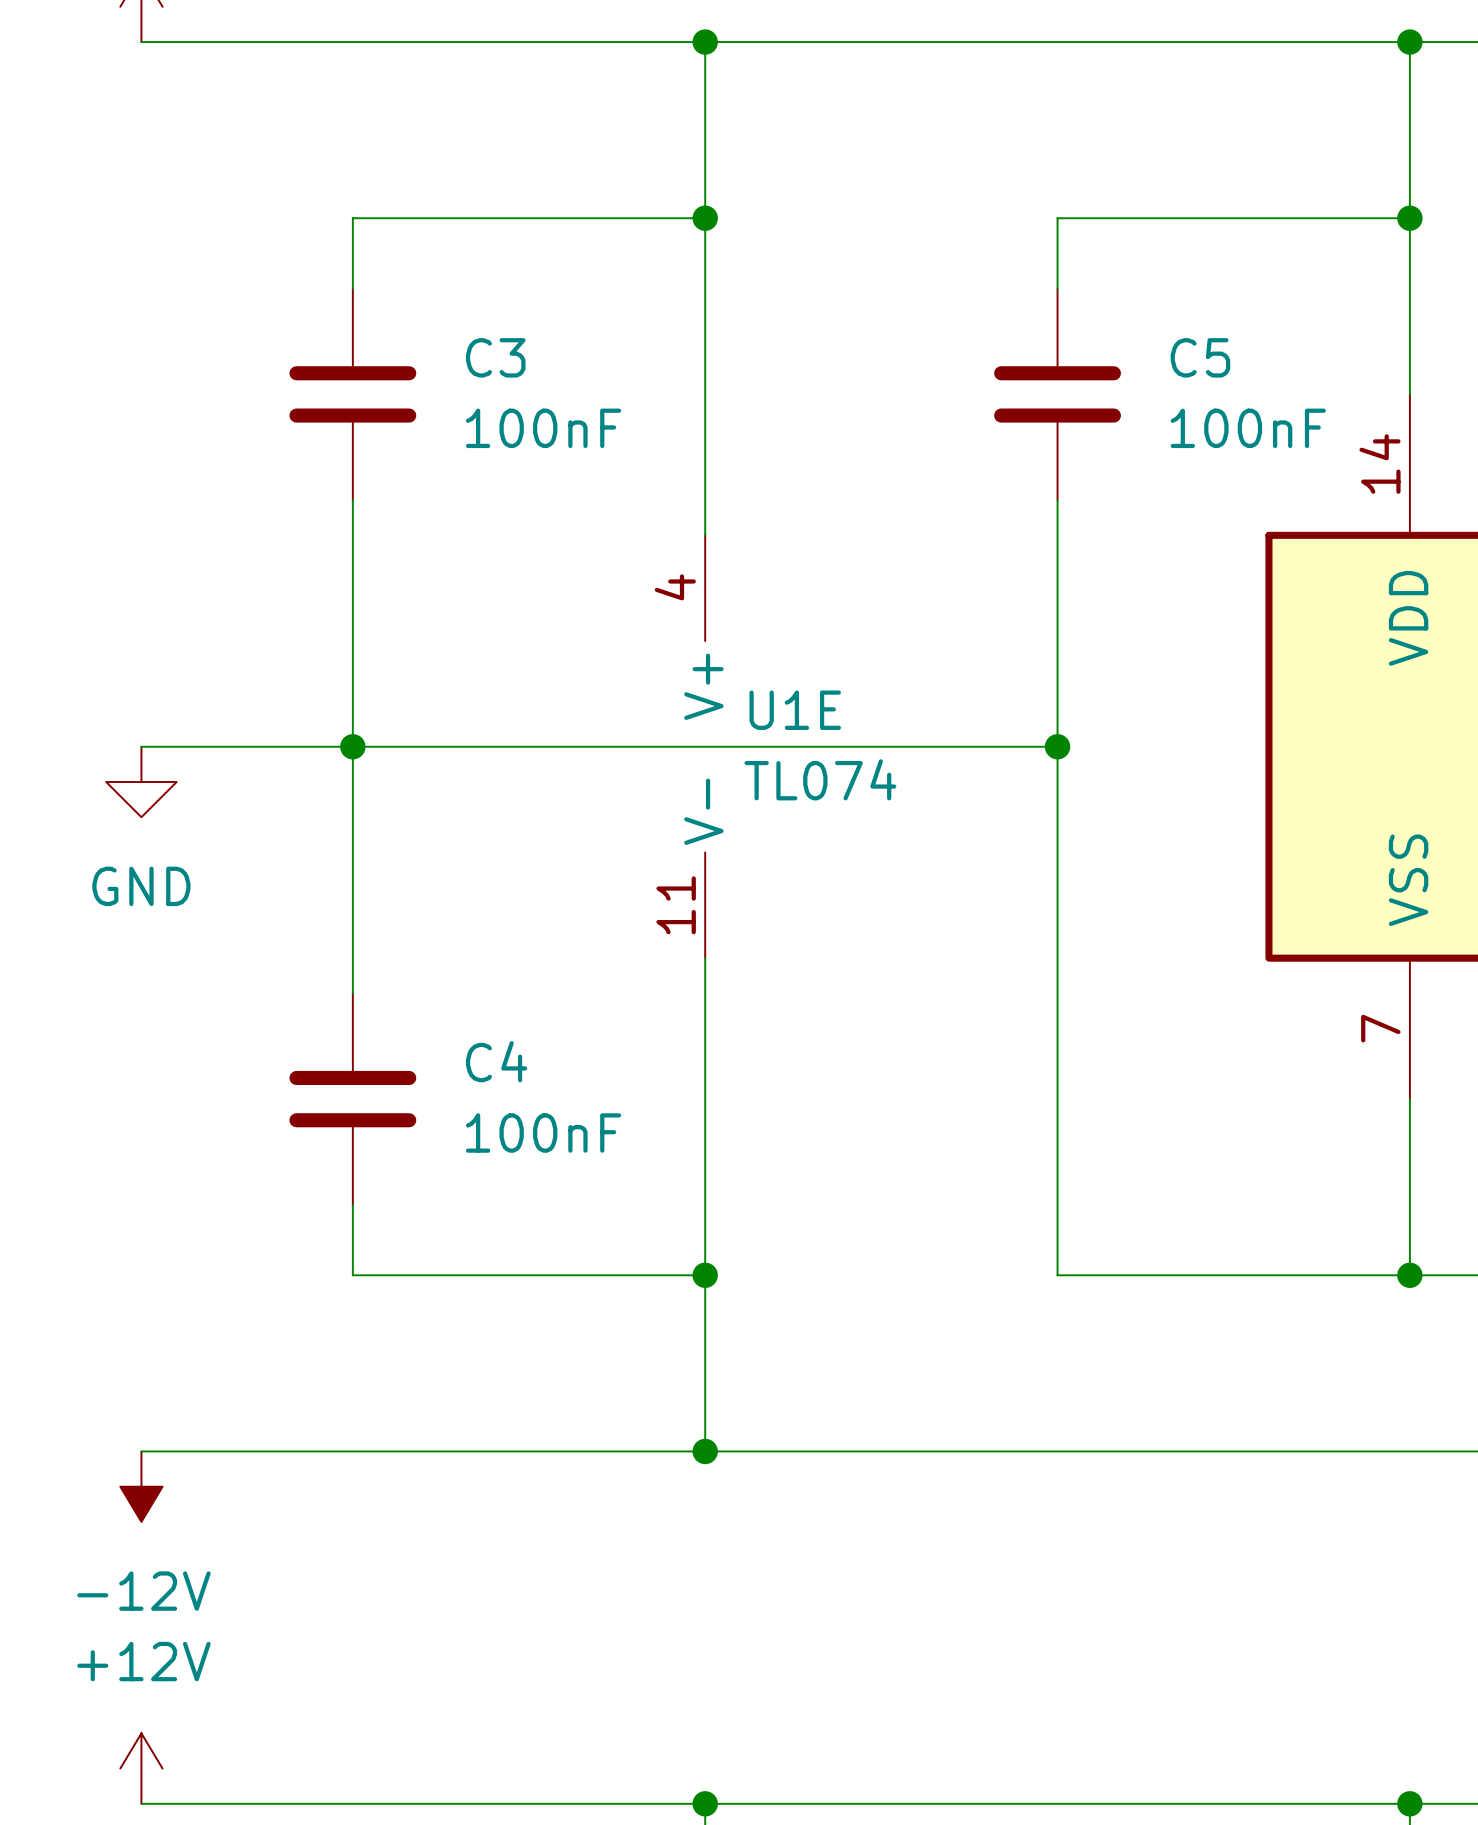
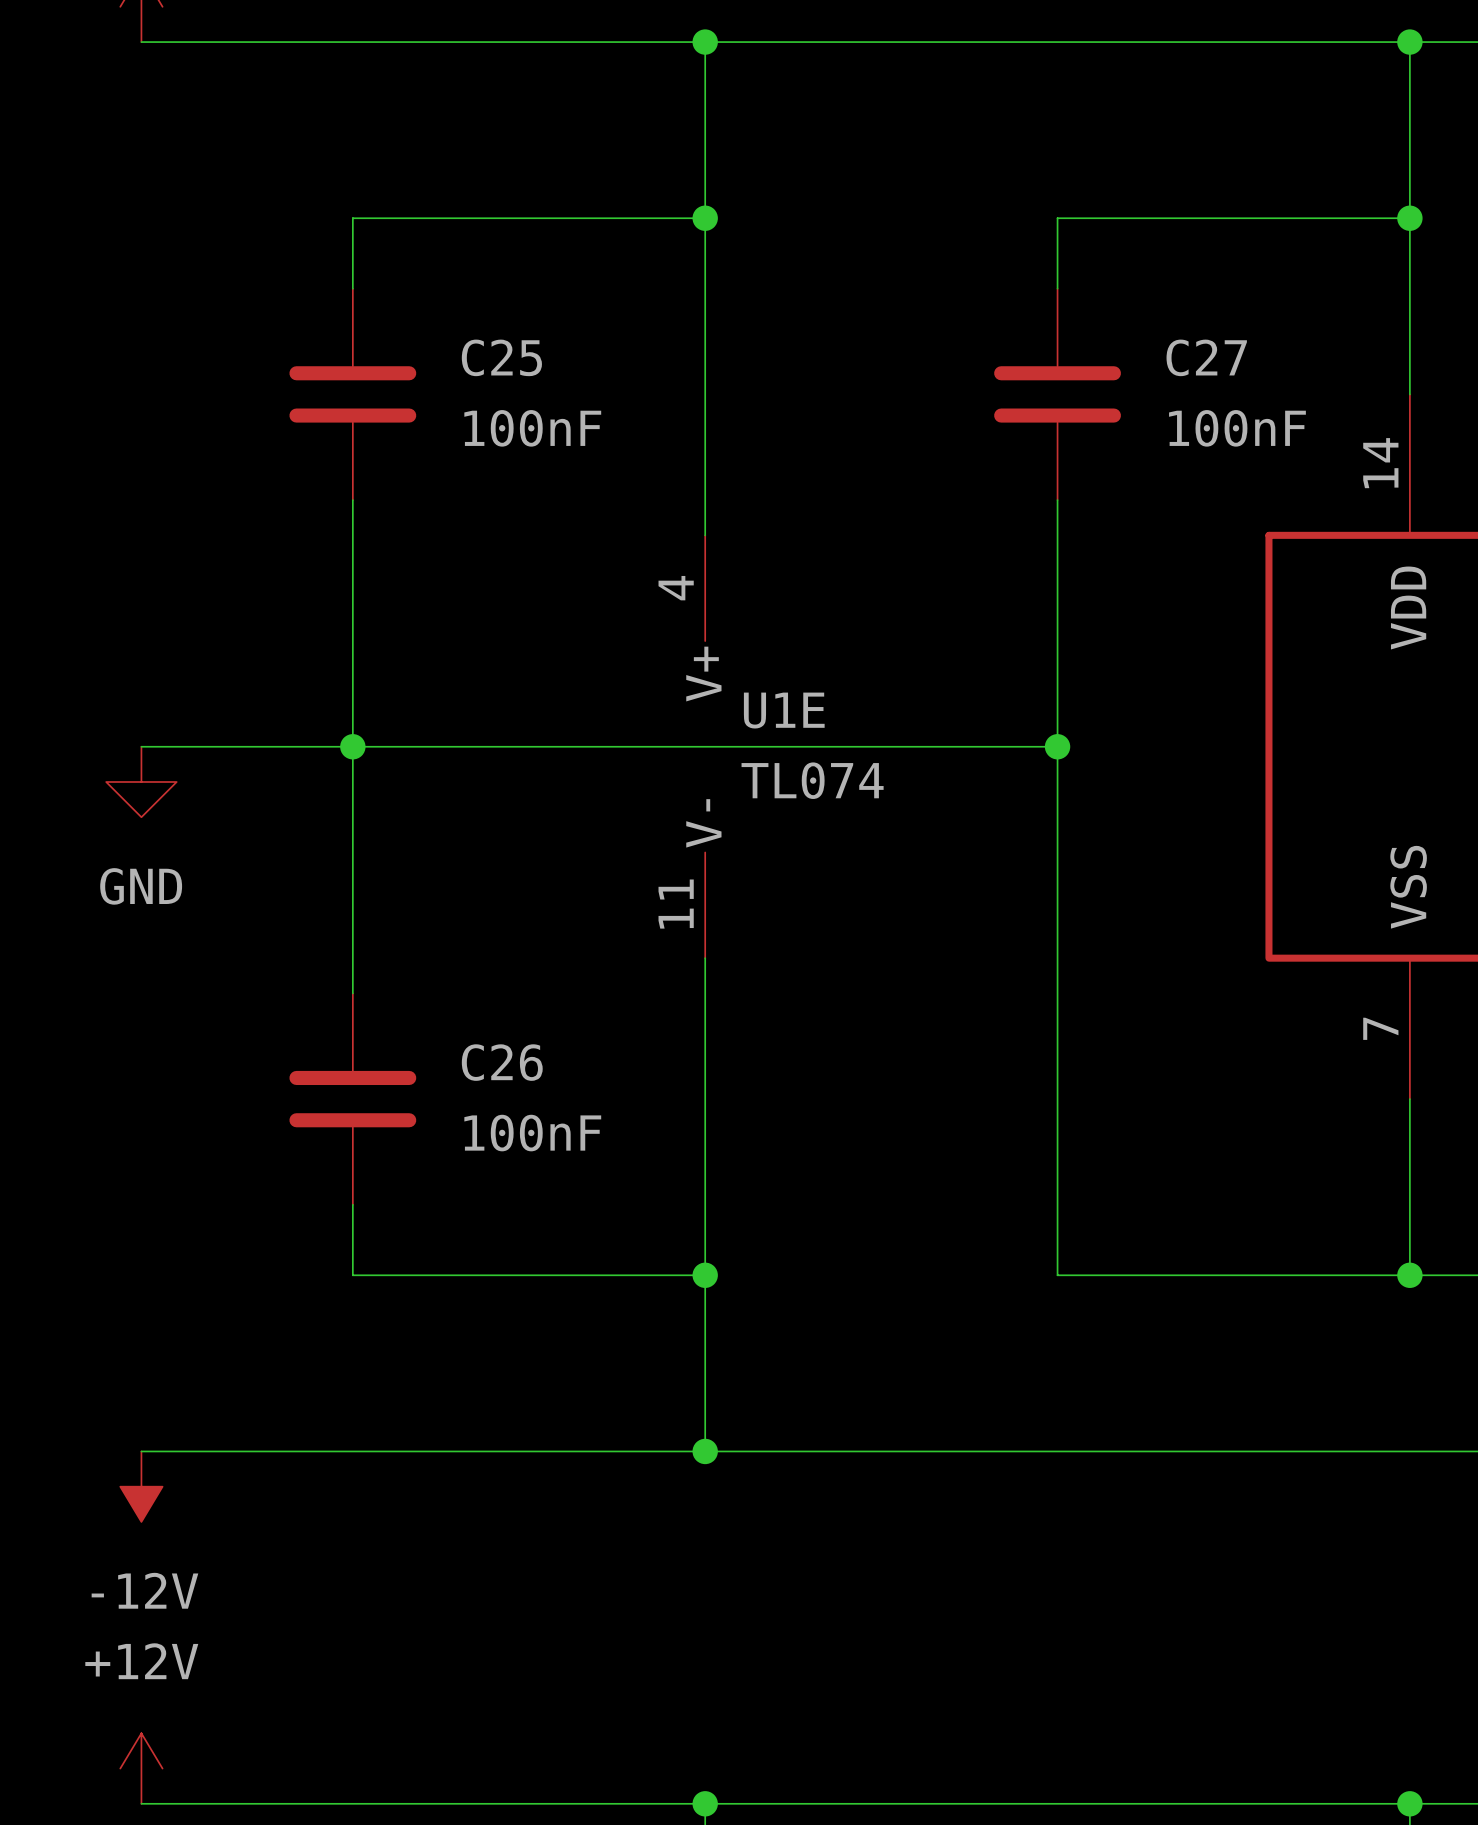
C3 name: C3 (495, 357) -> C25 (501, 357)
C5 name: C5 (1200, 357) -> C27 (1206, 357)
C4 name: C4 (496, 1061) -> C26 (502, 1062)

